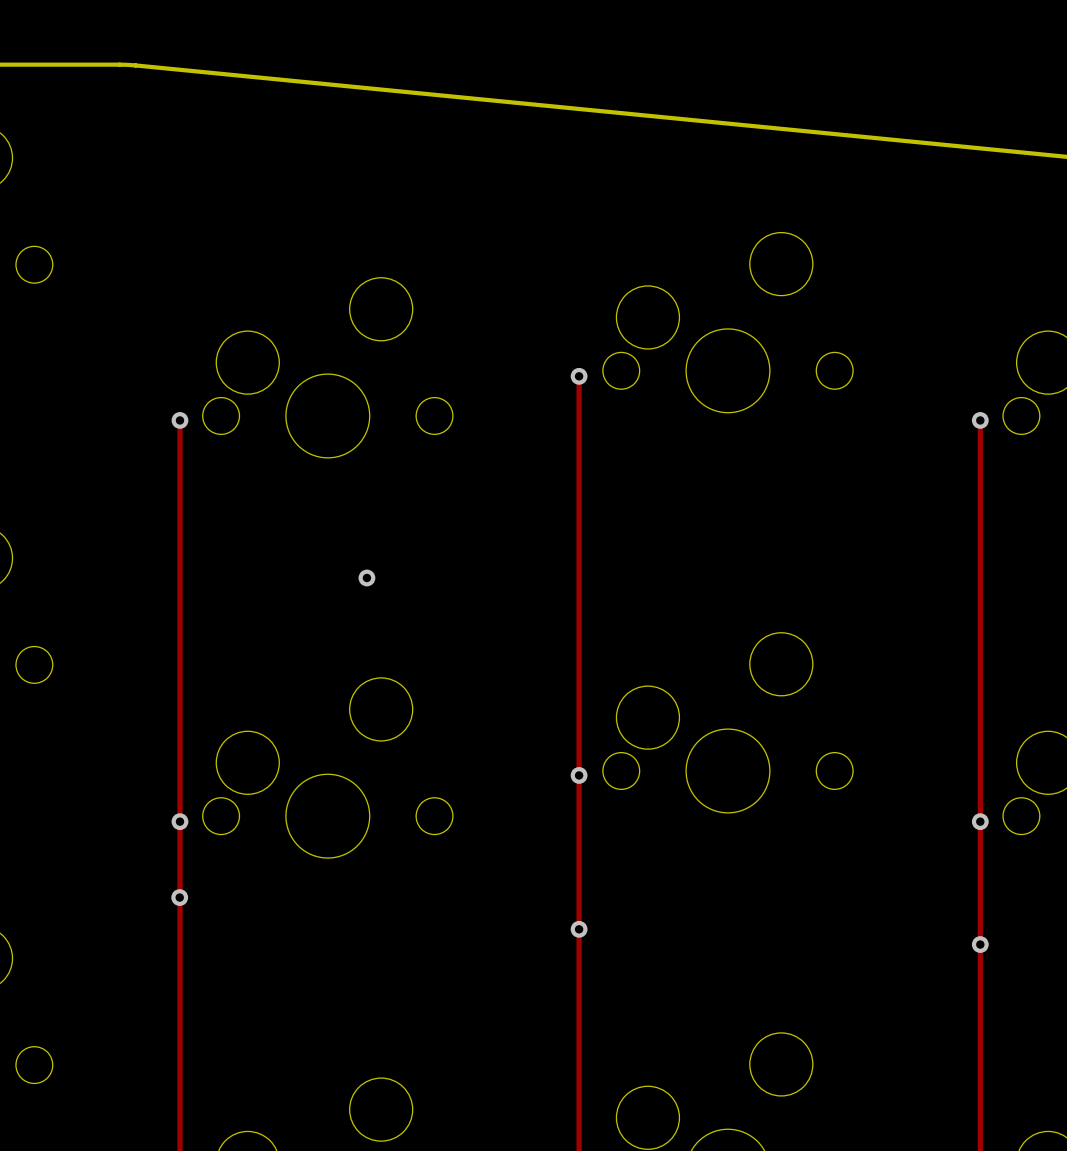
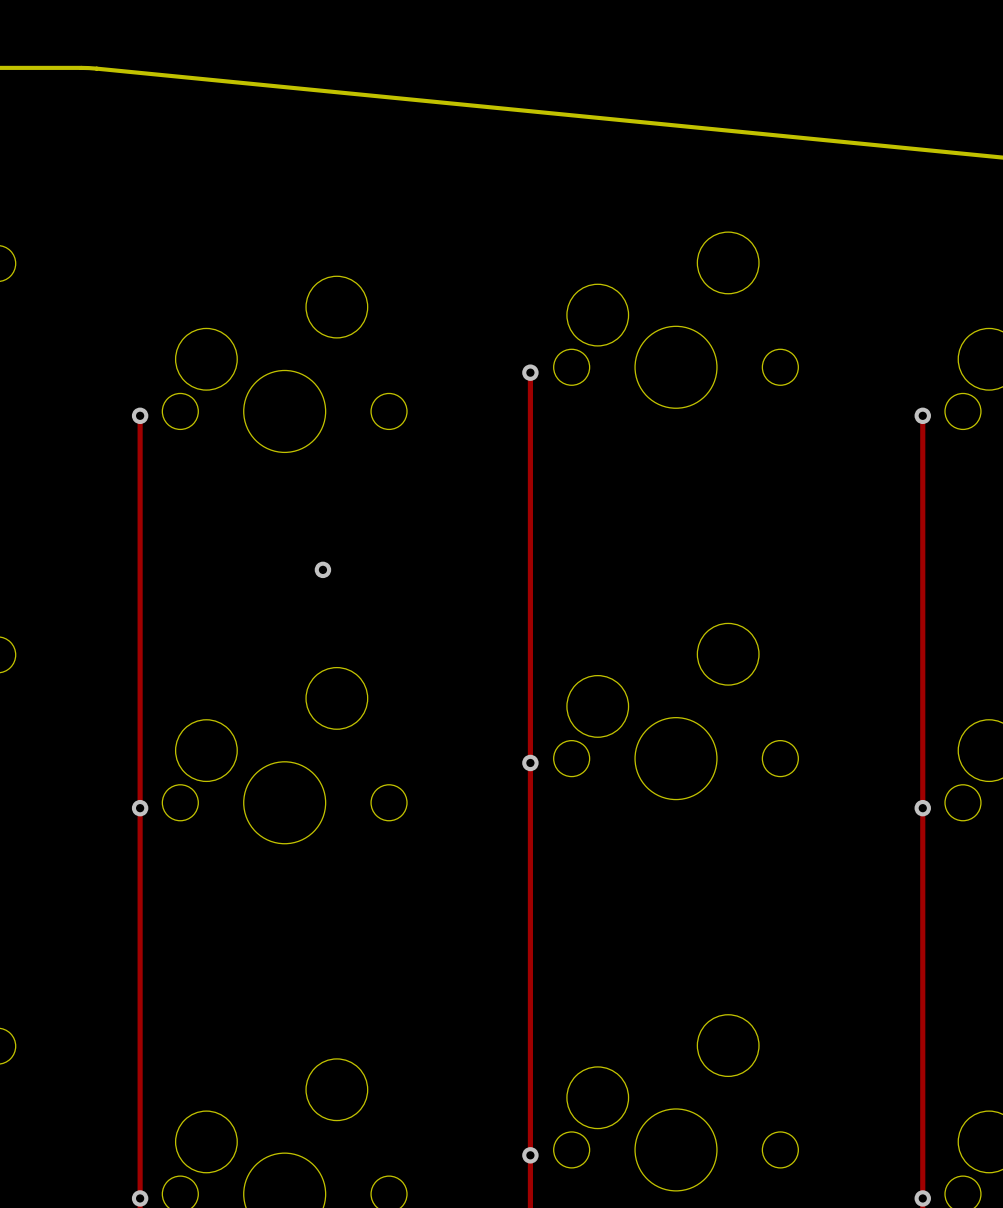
via: (179, 897) -> none
via: (579, 929) -> none
via: (980, 944) -> none

